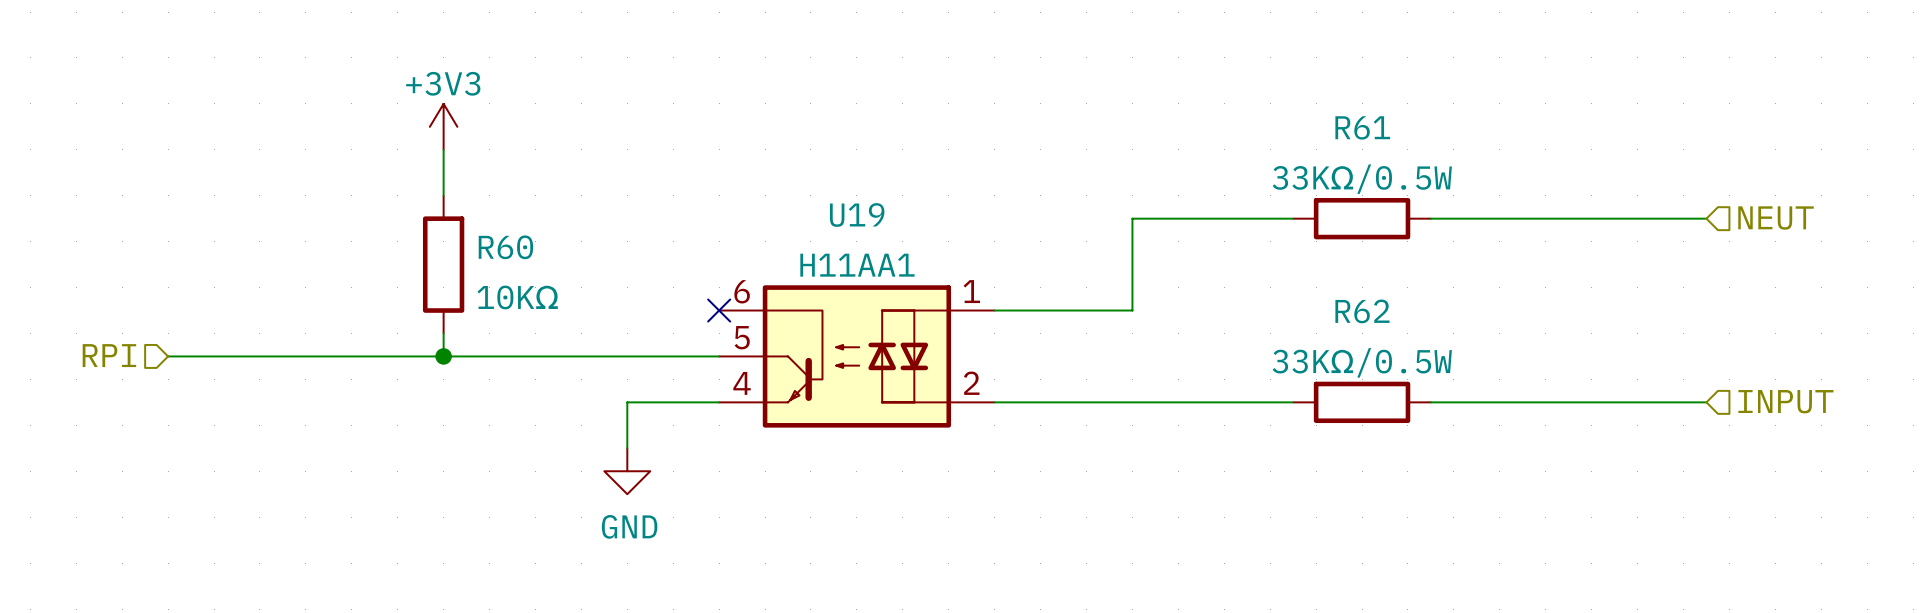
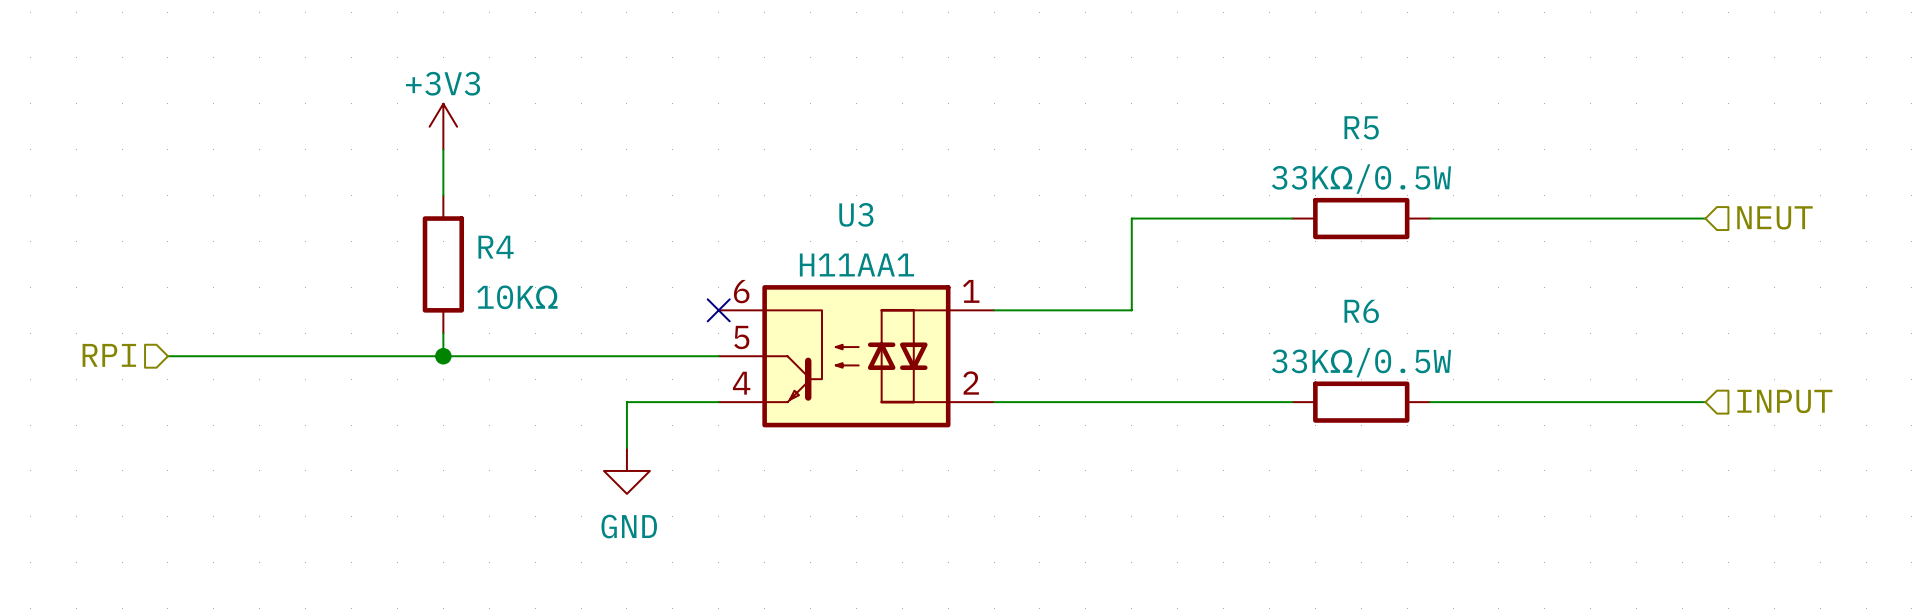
R61 name: R61 (1362, 127) -> R5 (1361, 127)
U19 name: U19 (857, 214) -> U3 (856, 214)
R60 name: R60 (505, 247) -> R4 (496, 247)
R62 name: R62 (1362, 311) -> R6 (1361, 311)

